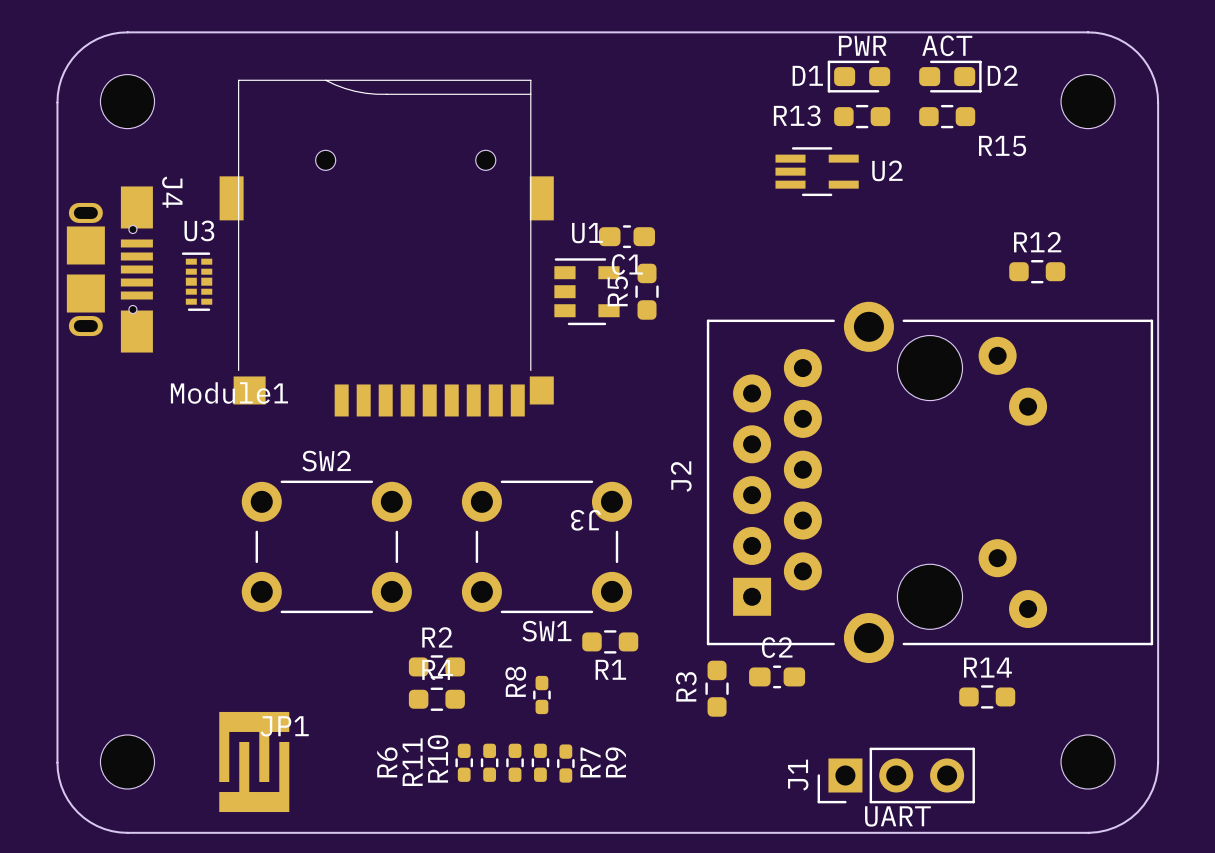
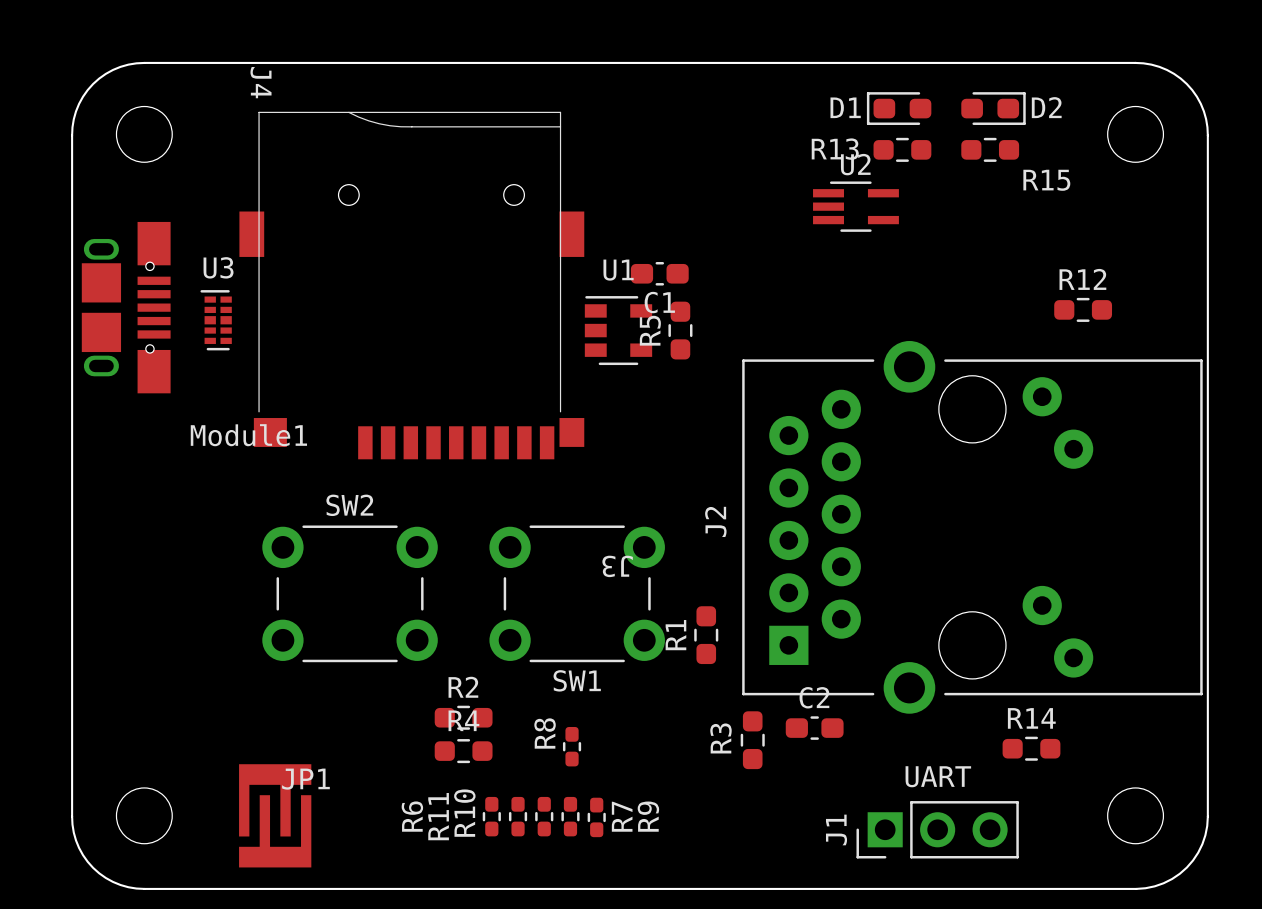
text: PWR (862, 45) -> none
text: ACT (947, 45) -> none
U2 name position: U2 (887, 170) -> U2 (855, 164)
J4 name position: J4 (172, 192) -> J4 (261, 82)
R1 rotation: 0° (610, 641) -> 90° clockwise (706, 635)
R1 position: (610, 641) -> (706, 635)
text position: UART (897, 816) -> UART (938, 776)

